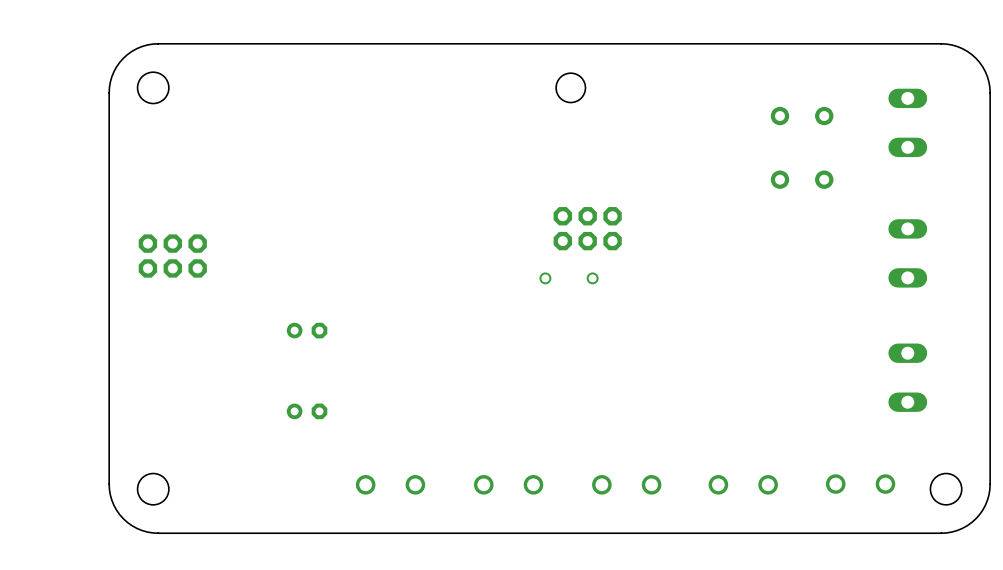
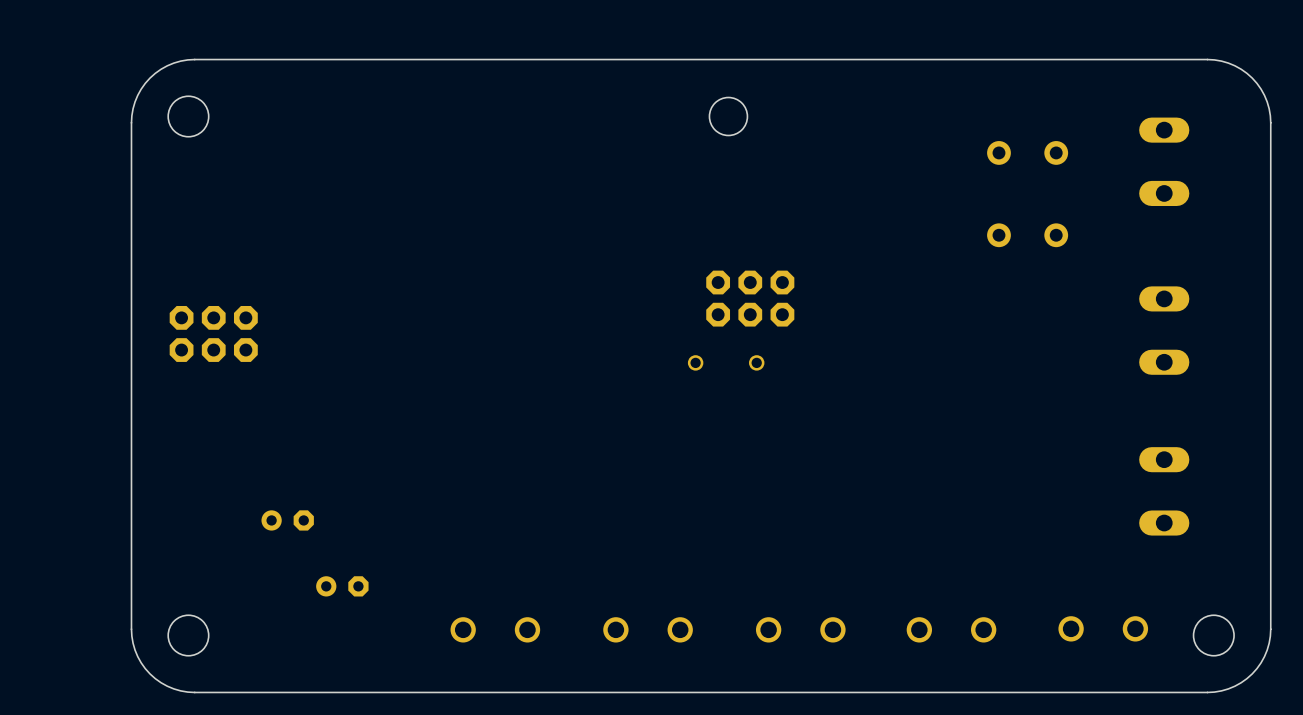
part: (307, 330) -> none
part: none -> (287, 520)
part: (307, 411) -> none
part: none -> (342, 586)

